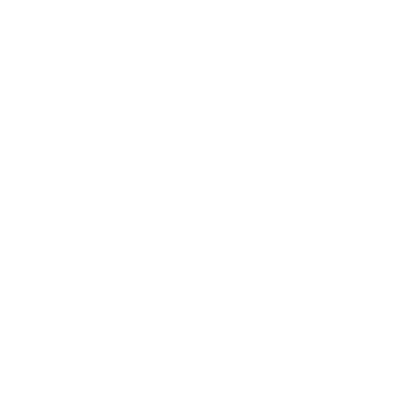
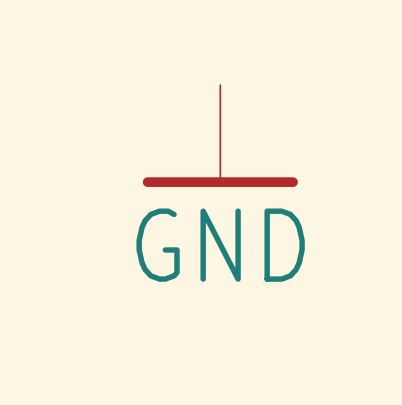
power symbol: none -> GND (220, 136)

